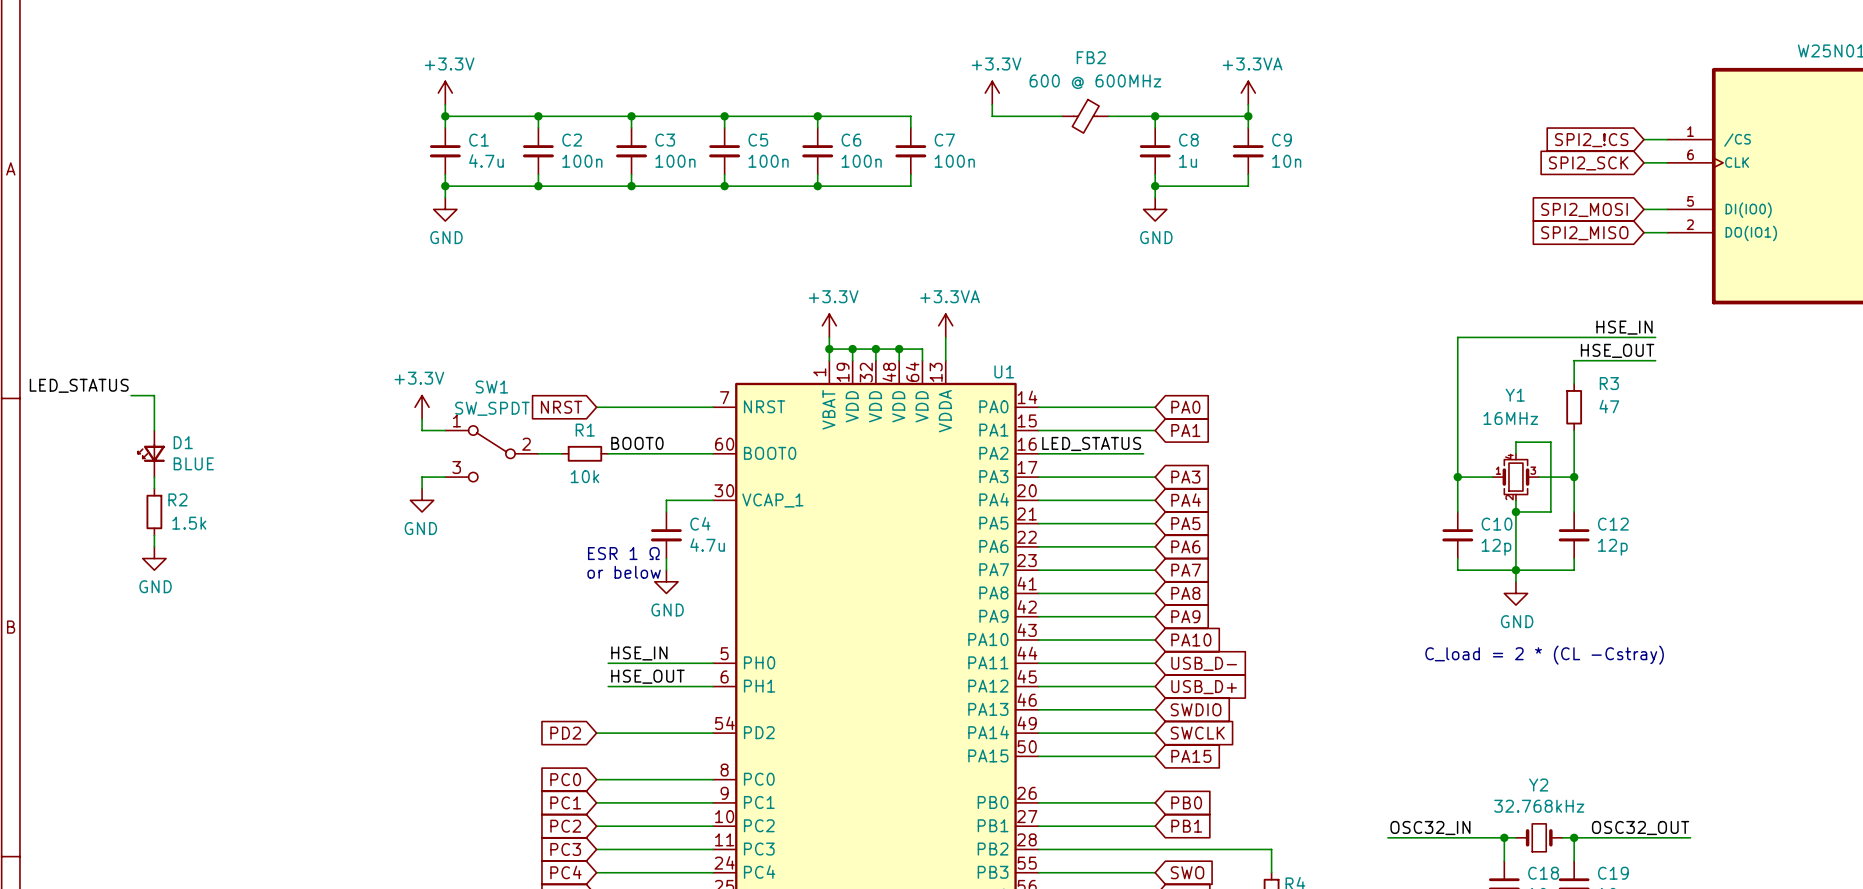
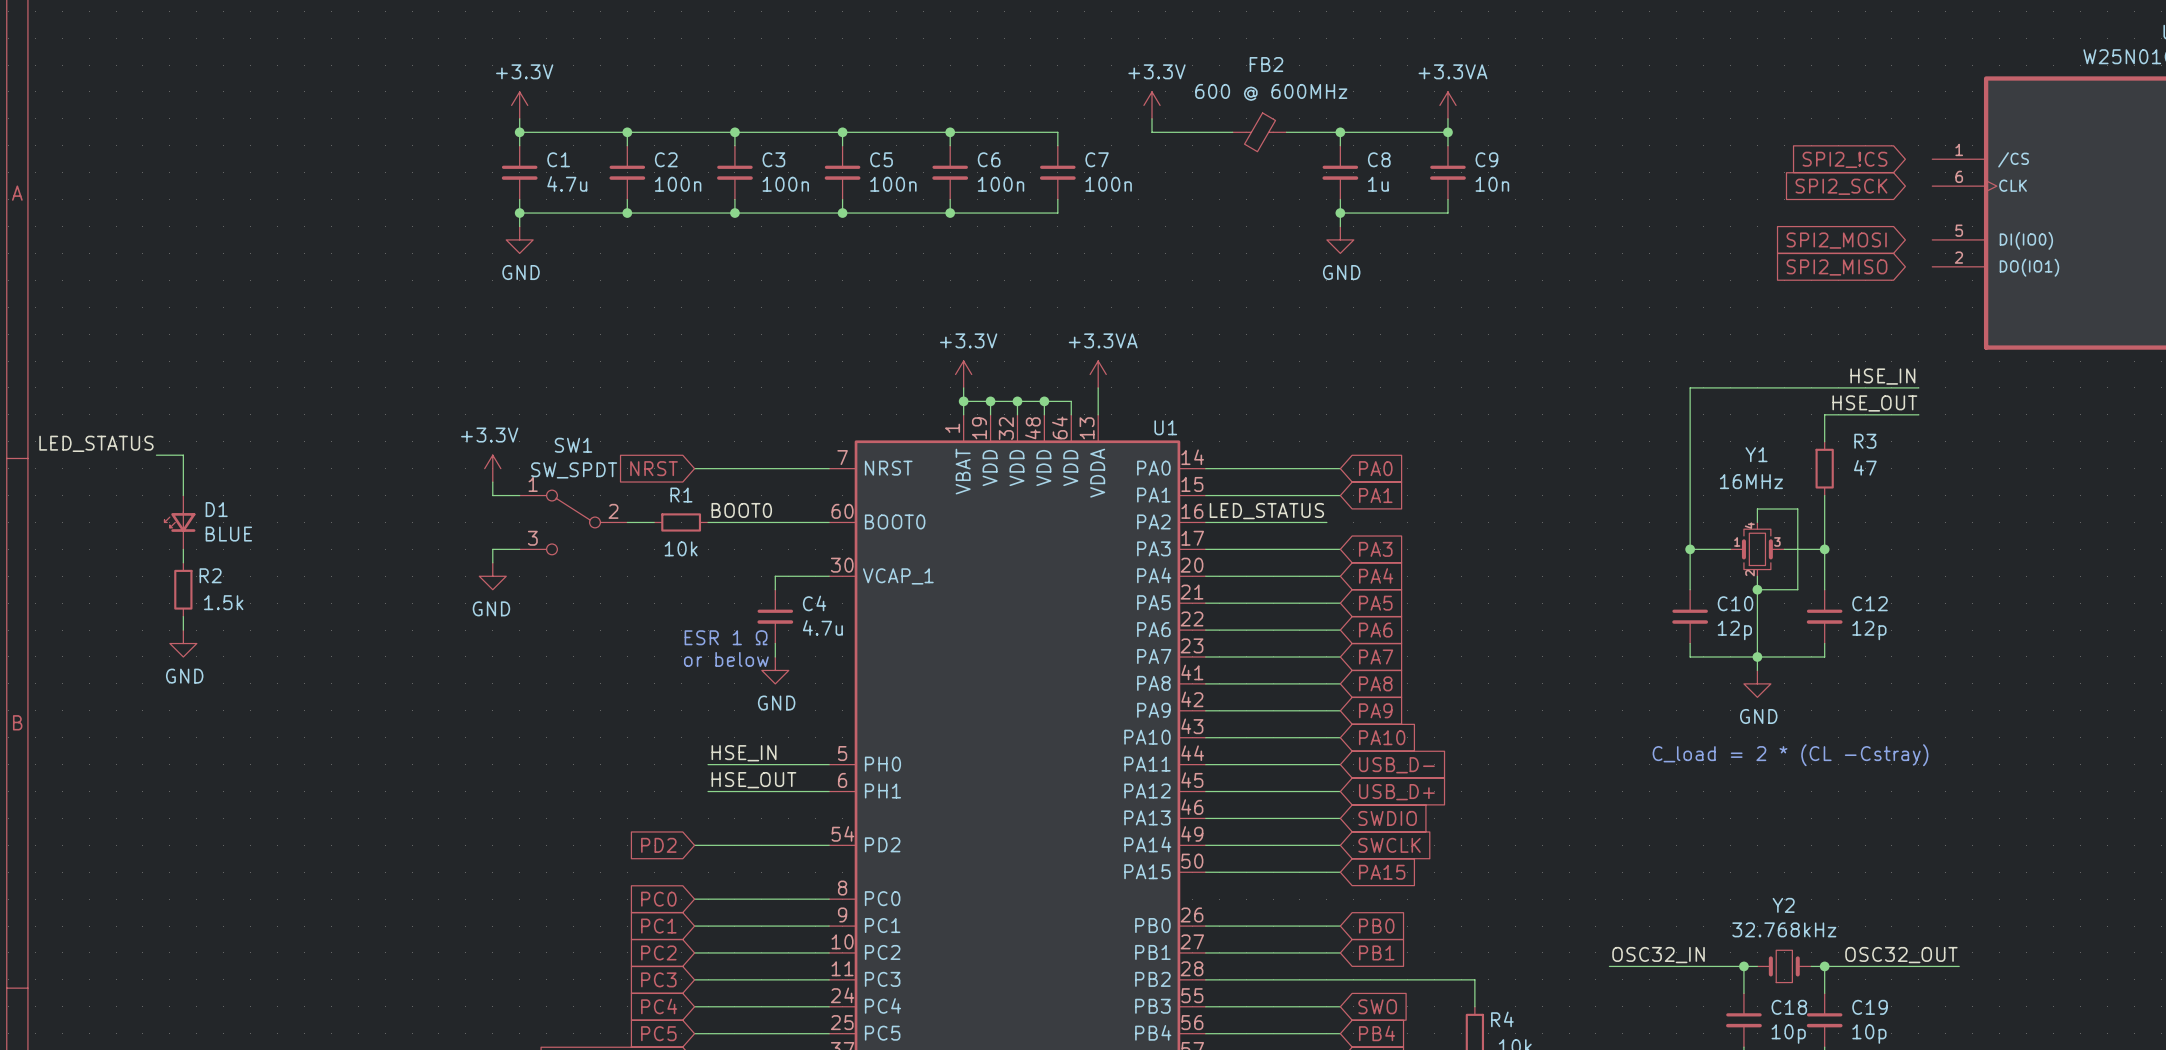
wire: (1643, 139) (1667, 139) -> none
wire: (1643, 162) (1667, 162) -> none
wire: (1643, 209) (1667, 209) -> none
wire: (1643, 232) (1667, 232) -> none

